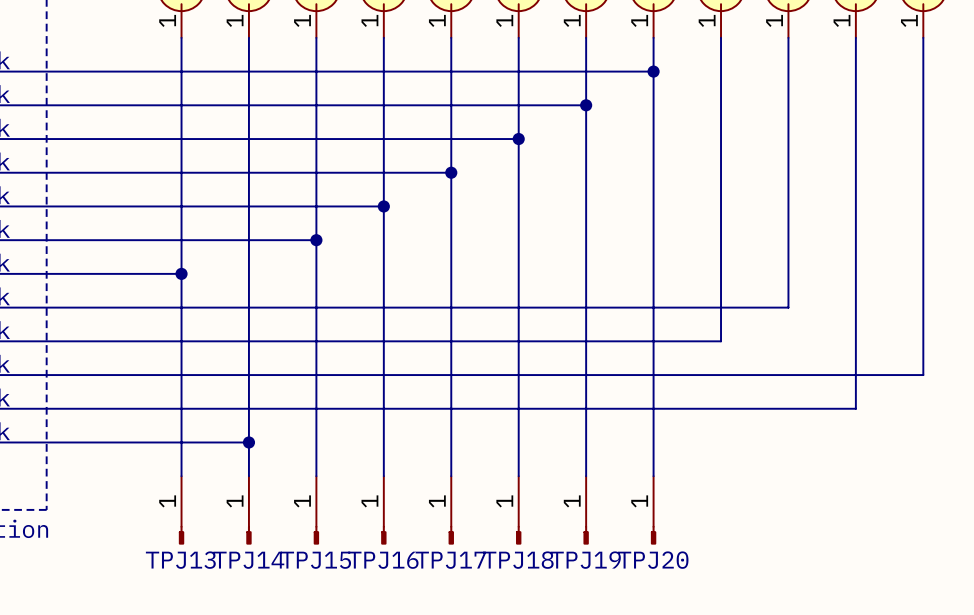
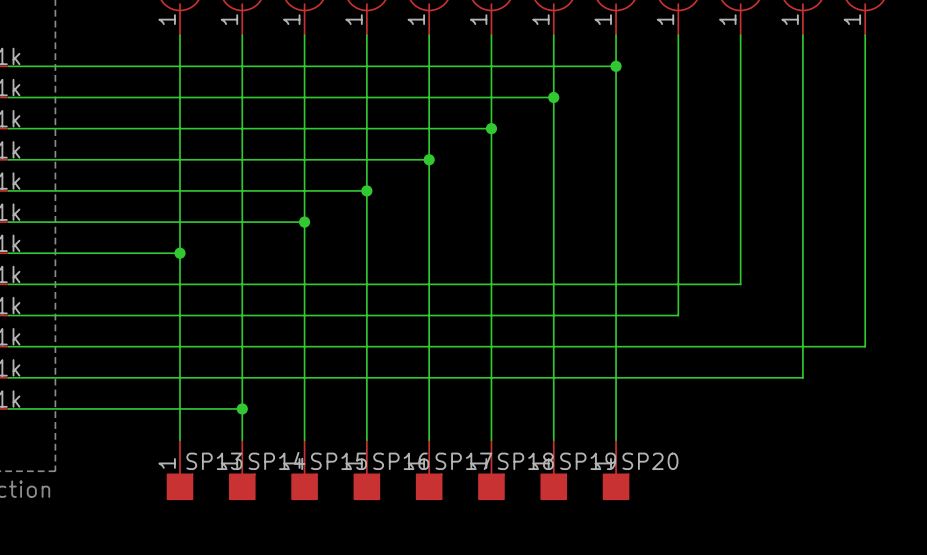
SP13: none -> (179, 469)
SP14: none -> (242, 469)
SP15: none -> (304, 469)
SP16: none -> (366, 469)
SP17: none -> (429, 469)
SP18: none -> (491, 469)
SP19: none -> (553, 469)
SP20: none -> (616, 469)
TPJ13: (181, 510) -> none
TPJ14: (248, 510) -> none
TPJ15: (316, 510) -> none
TPJ16: (383, 510) -> none
TPJ17: (451, 510) -> none
TPJ18: (518, 510) -> none
TPJ19: (586, 510) -> none
TPJ20: (653, 510) -> none

